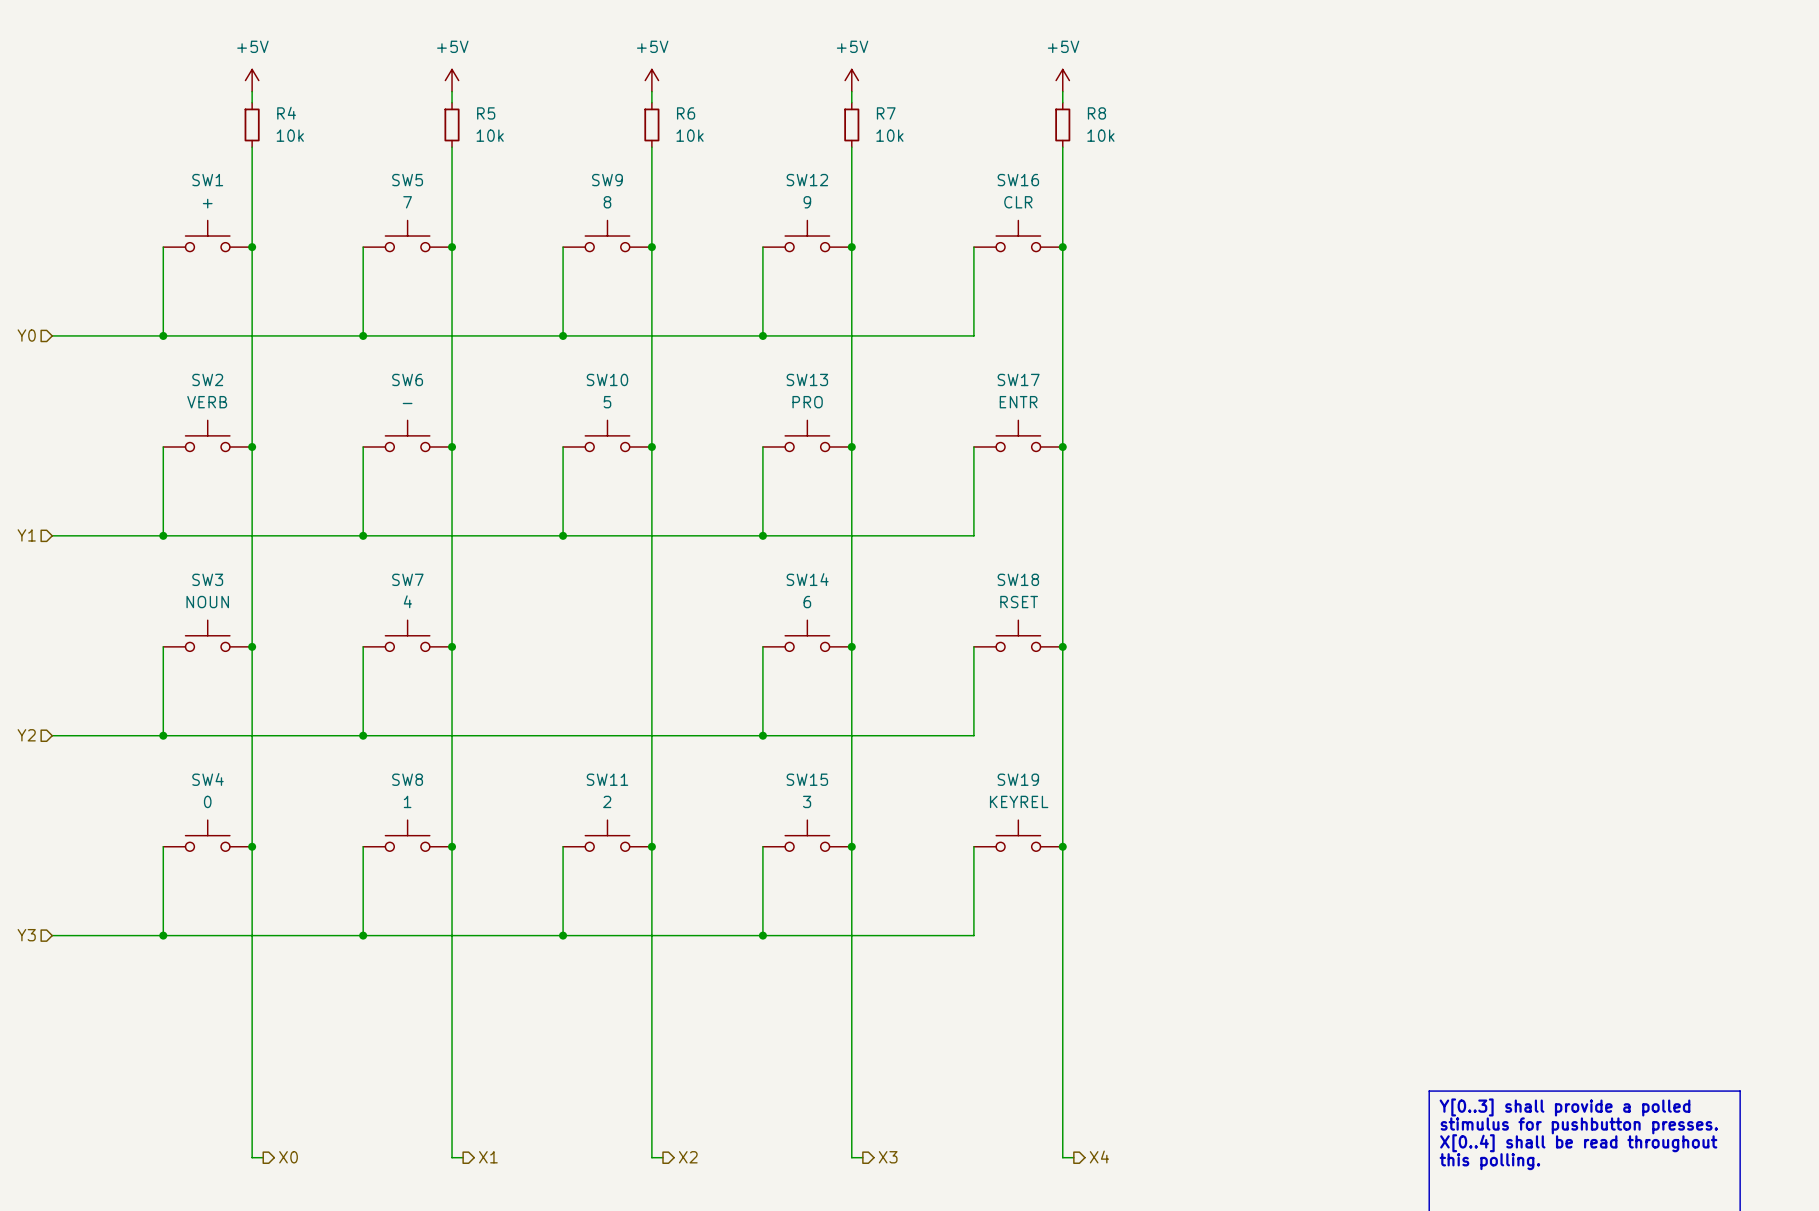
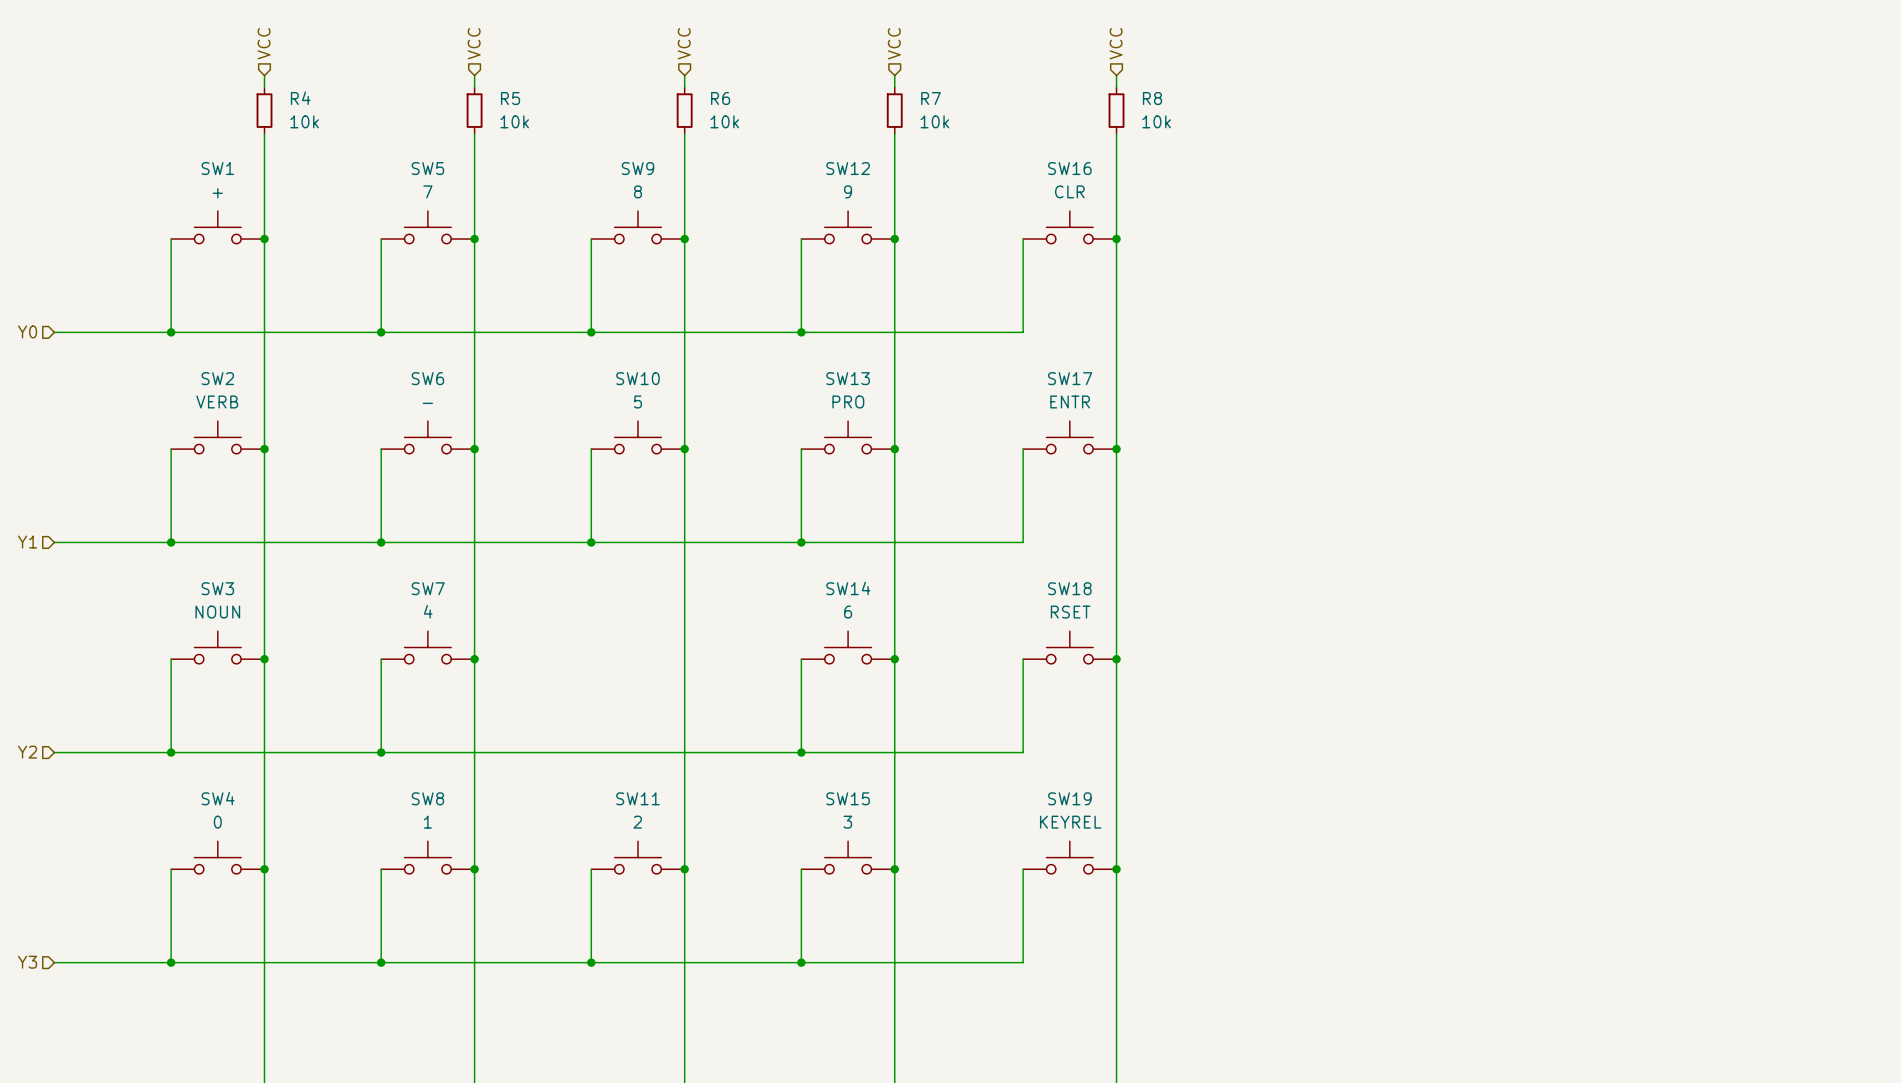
hierarchical label: none -> VCC (264, 43)
hierarchical label: none -> VCC (474, 43)
hierarchical label: none -> VCC (684, 43)
hierarchical label: none -> VCC (894, 43)
hierarchical label: none -> VCC (1116, 43)
power symbol: +5V (252, 80) -> none
power symbol: +5V (452, 80) -> none
power symbol: +5V (651, 80) -> none
power symbol: +5V (851, 80) -> none
power symbol: +5V (1062, 80) -> none

